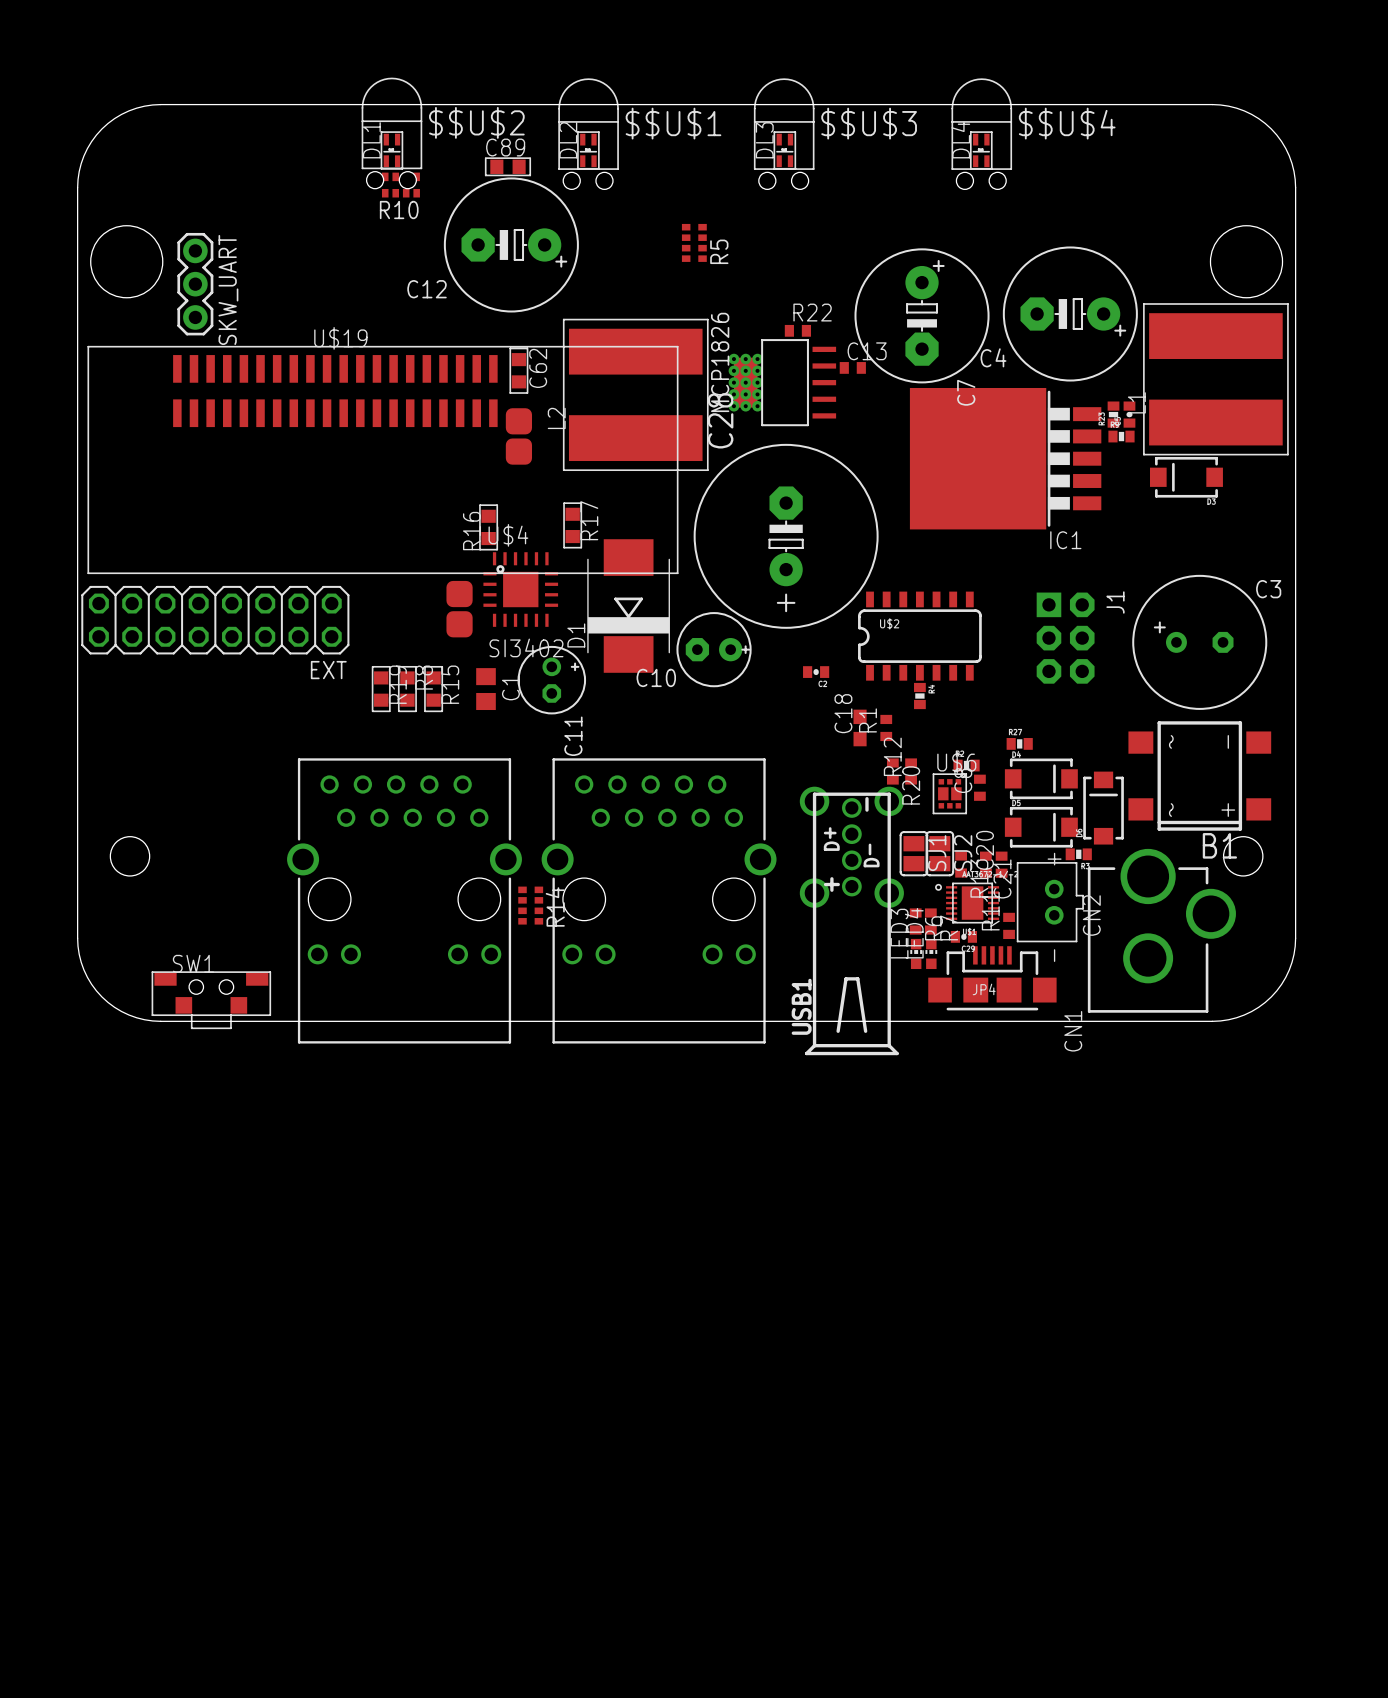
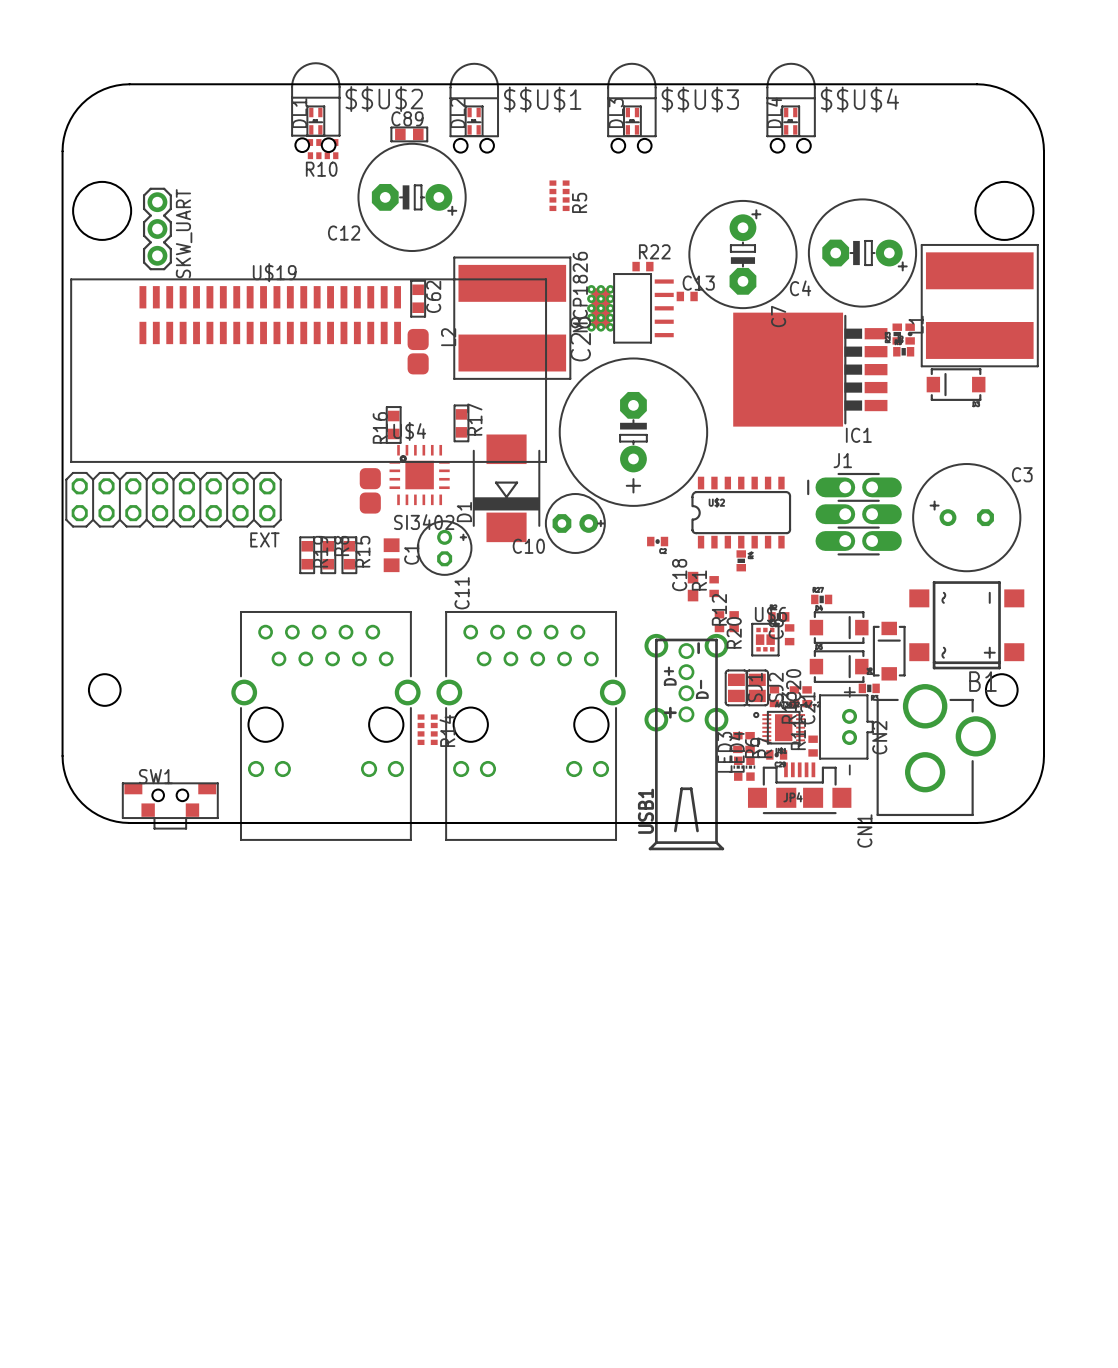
J1 footprint: [1036, 592, 1095, 684] -> [807, 472, 902, 556]
J1 name position: J1 (1115, 602) -> J1 (842, 460)

